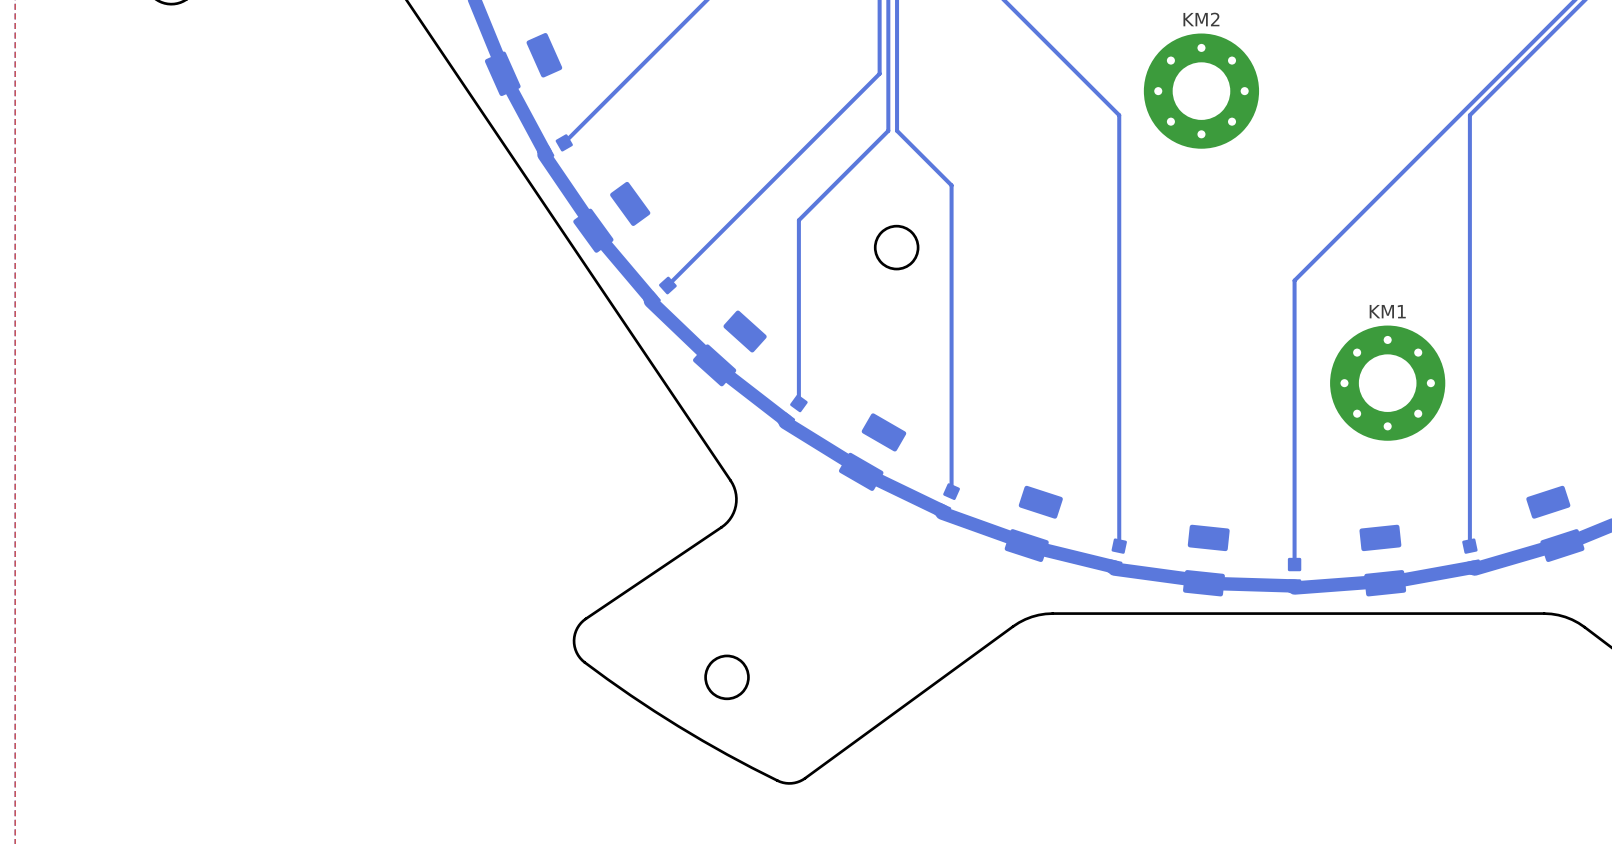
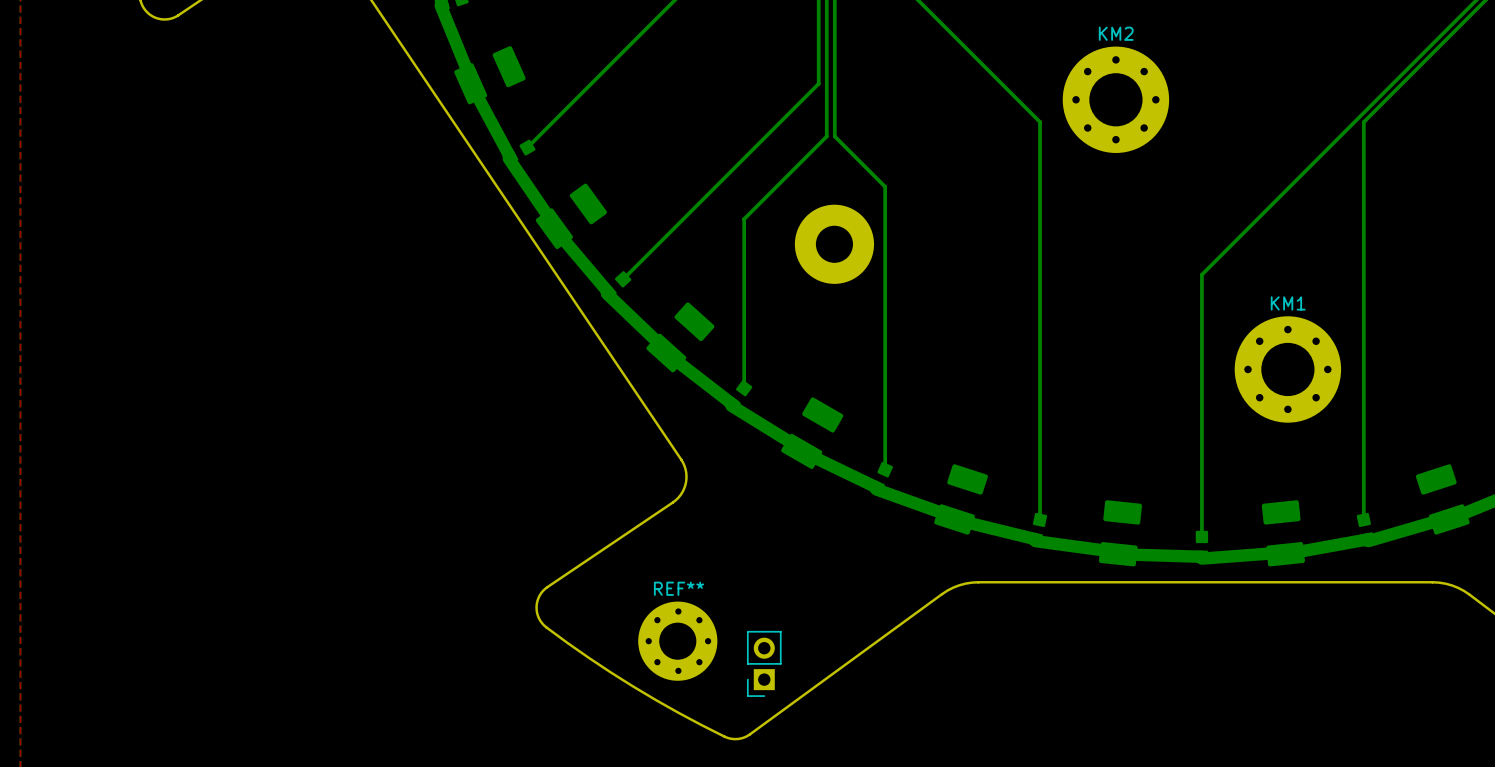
part: none -> (834, 244)
REF**: none -> (677, 641)
part: none -> (764, 663)

